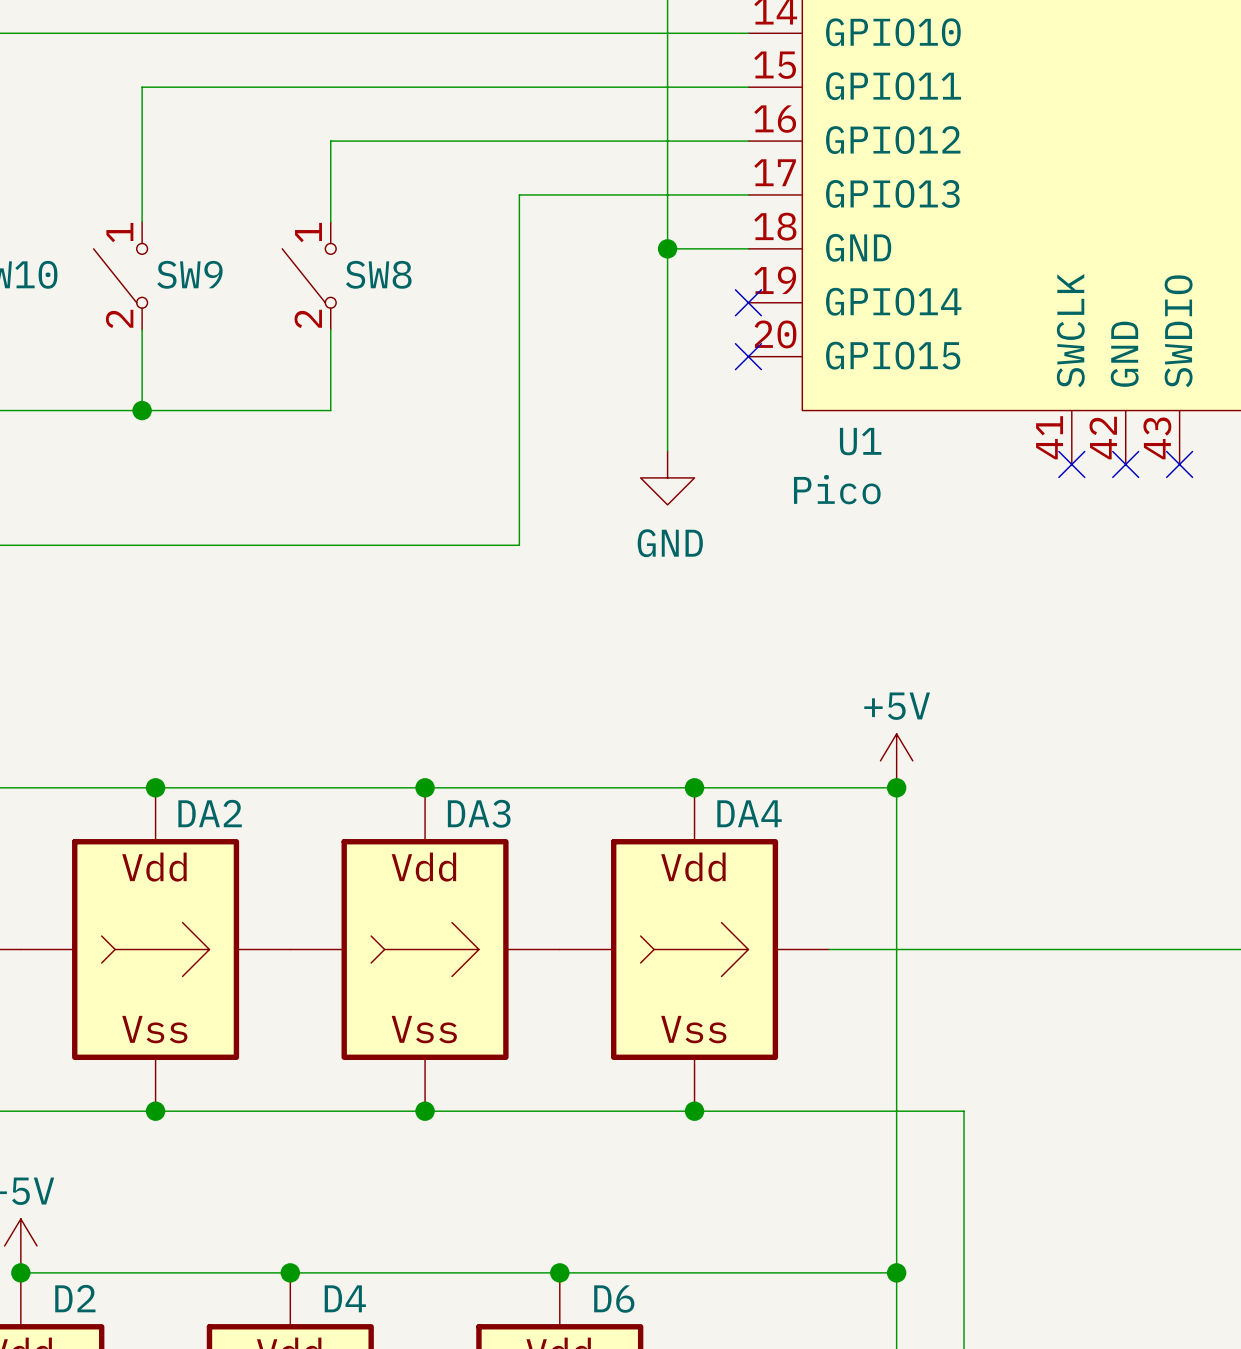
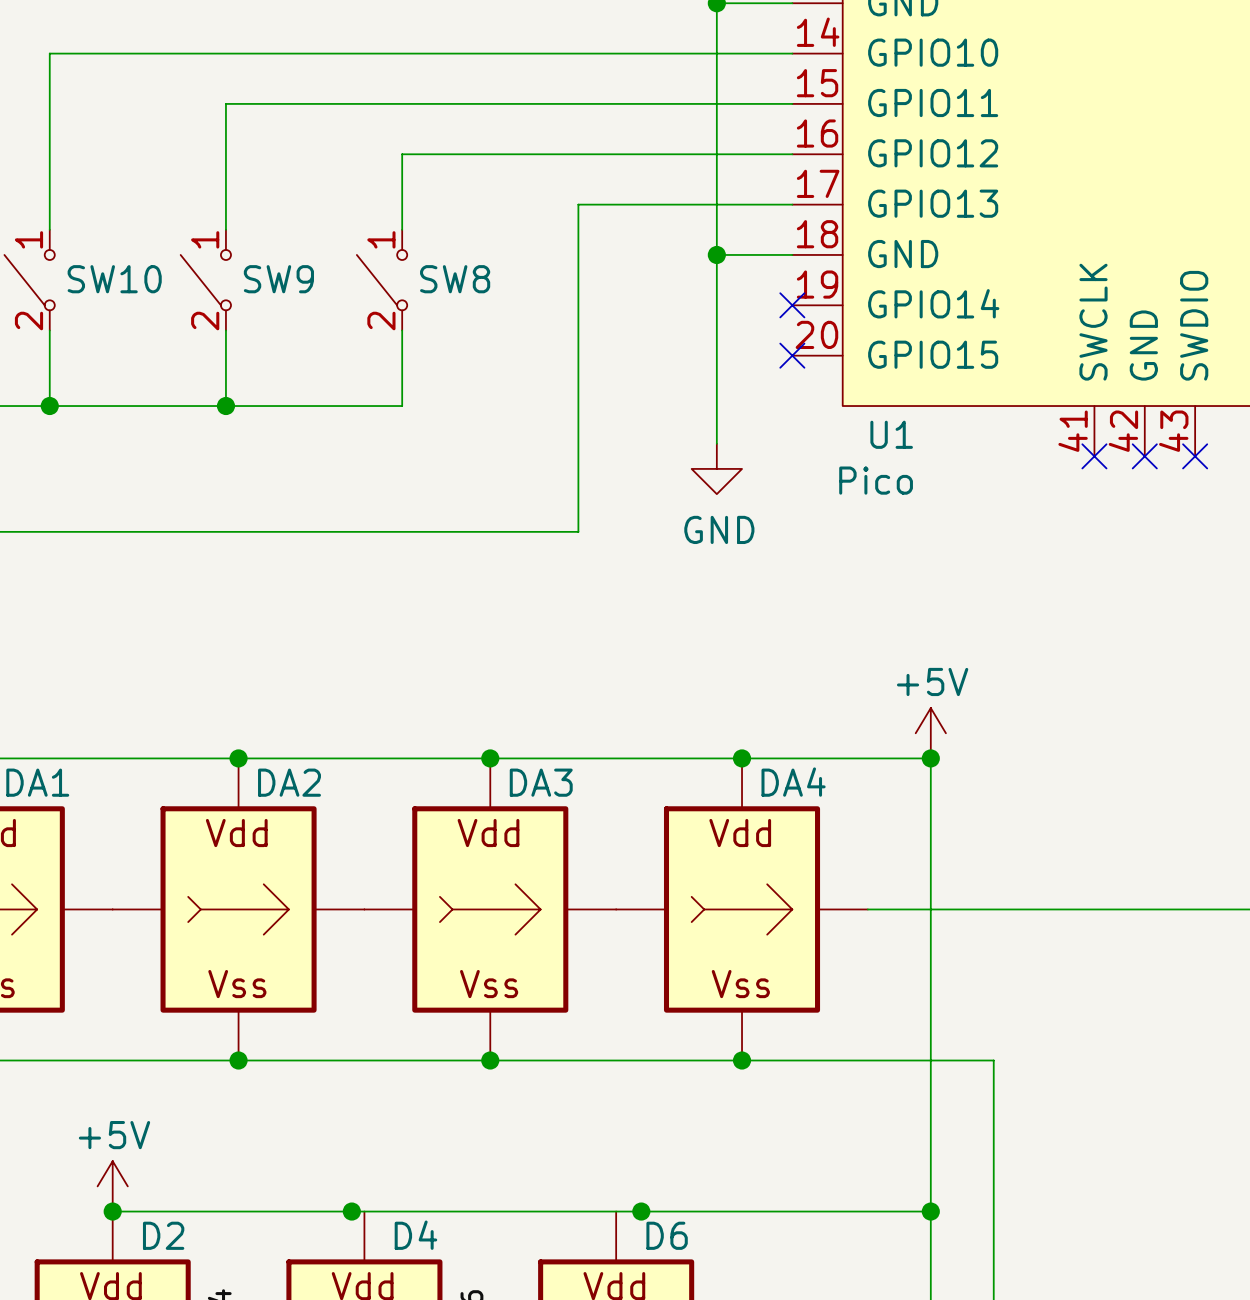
junction position: (290, 1272) -> (351, 1211)
junction position: (559, 1272) -> (641, 1211)

